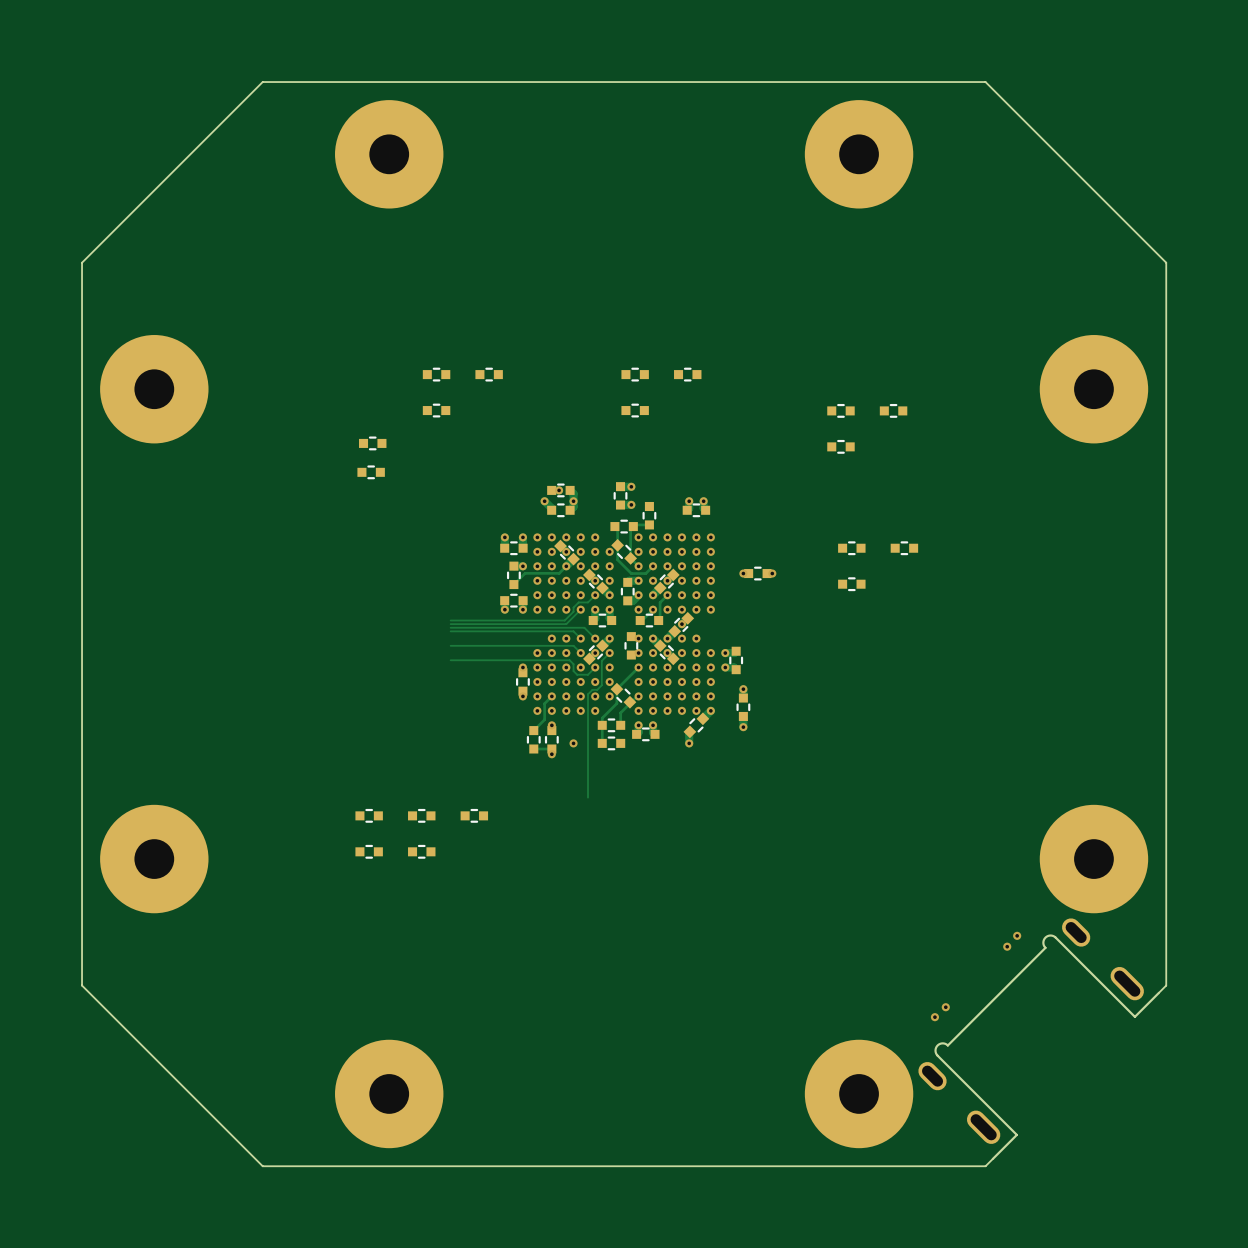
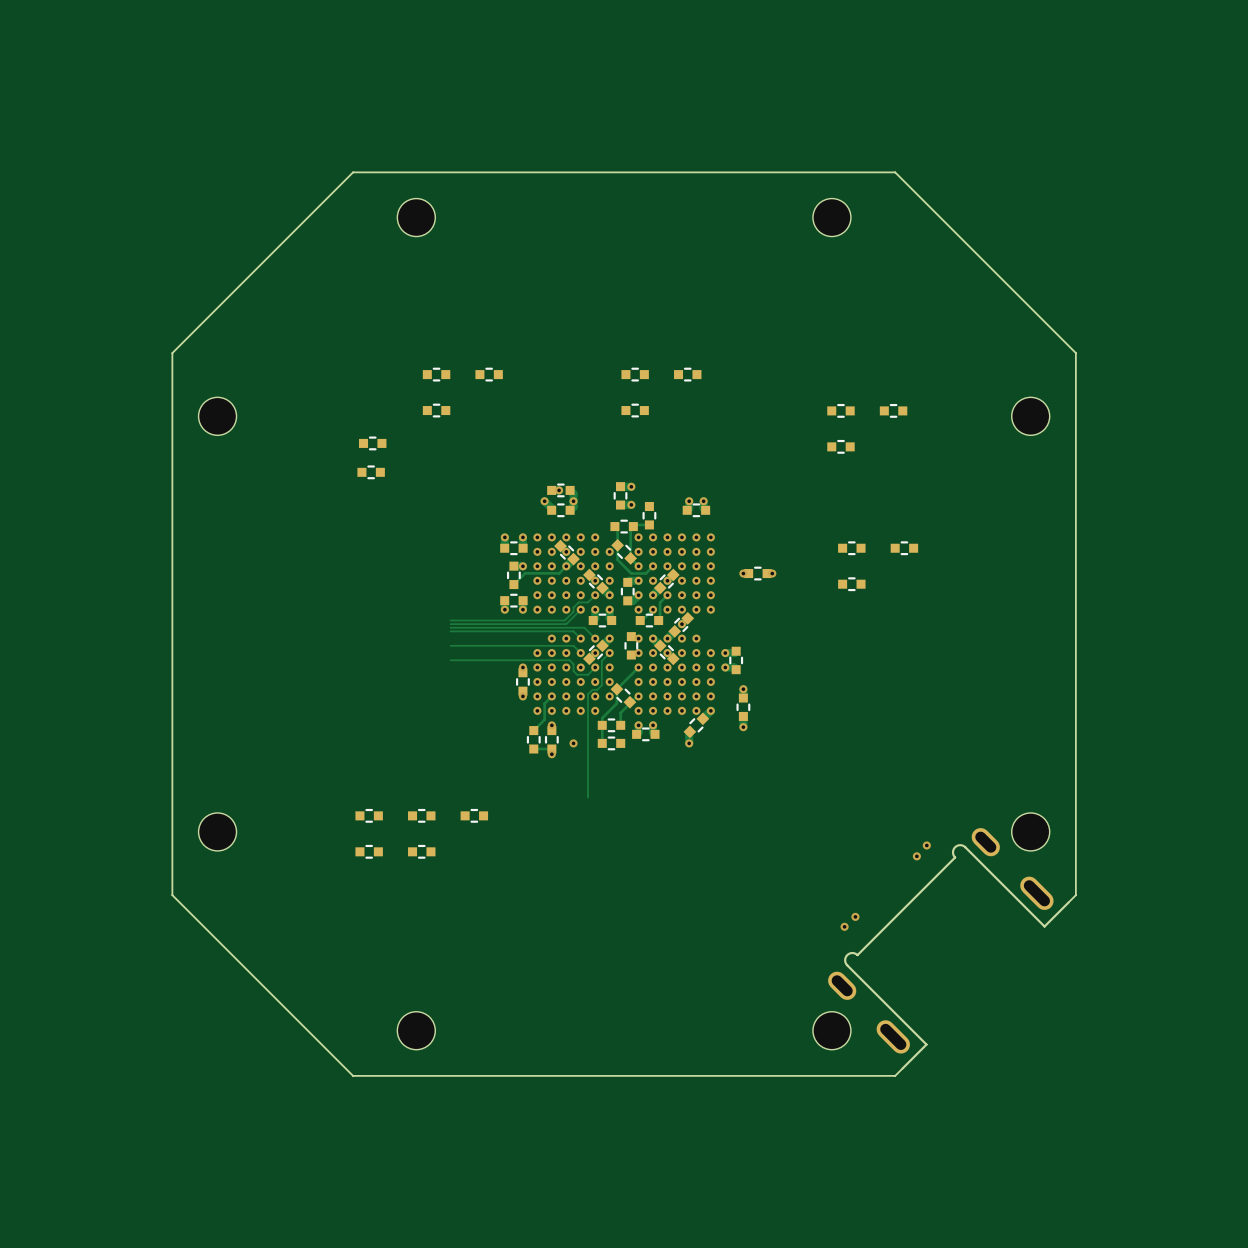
part: (389, 154) -> none
part: (859, 154) -> none
part: none -> (416, 217)
part: none -> (831, 217)
part: (154, 389) -> none
part: (1093, 389) -> none
part: none -> (217, 416)
part: none -> (1030, 416)
part: none -> (217, 831)
part: none -> (1030, 831)
via: none -> (926, 845)
via: none -> (916, 856)
part: (154, 859) -> none
part: (1093, 859) -> none
board edge: none -> (1068, 902) (1075, 895) (1075, 353) (895, 172) (353, 172) (172, 353) (172, 895) (353, 1075) (895, 1075) (902, 1068)
via: none -> (855, 916)
via: none -> (844, 926)
via: (1017, 935) -> none
via: (1007, 946) -> none
board edge: (1158, 992) (1166, 985) (1166, 262) (985, 82) (262, 82) (82, 262) (82, 985) (262, 1166) (985, 1166) (992, 1158) -> none
via: (945, 1007) -> none
via: (934, 1017) -> none
part: none -> (416, 1030)
part: none -> (831, 1030)
part position: (1039, 1039) -> (948, 948)
part: (389, 1093) -> none
part: (859, 1093) -> none

